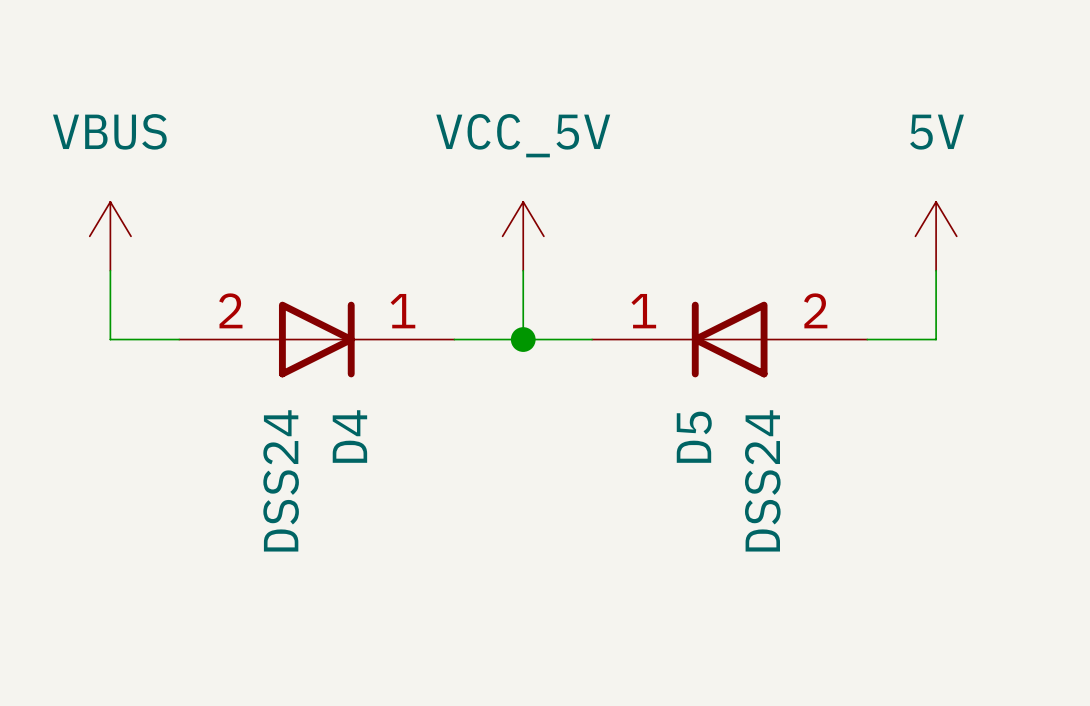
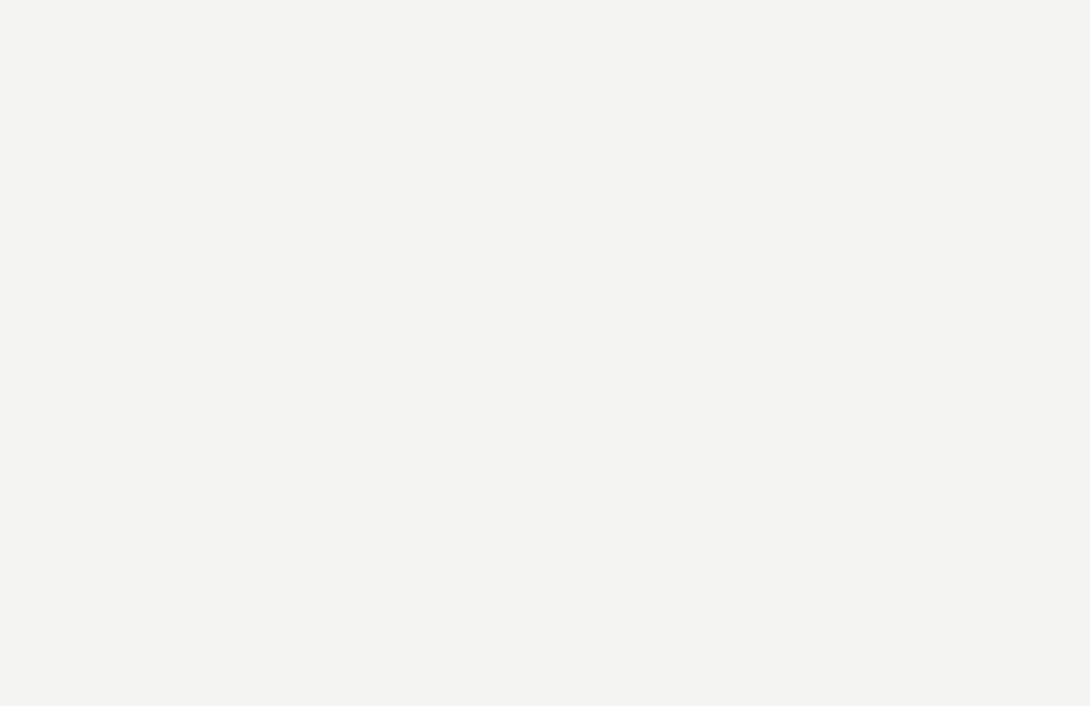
power symbol: VBUS (110, 236) -> none
power symbol: VCC_5V (523, 236) -> none
power symbol: 5V (936, 236) -> none
wire: (110, 270) (110, 339) (179, 339) -> none
wire: (523, 270) (523, 339) -> none
wire: (936, 270) (936, 339) (867, 339) -> none
D4: DSS24 (316, 339) -> none
wire: (454, 339) (592, 339) -> none
junction: (523, 339) -> none
D5: DSS24 (729, 339) -> none

